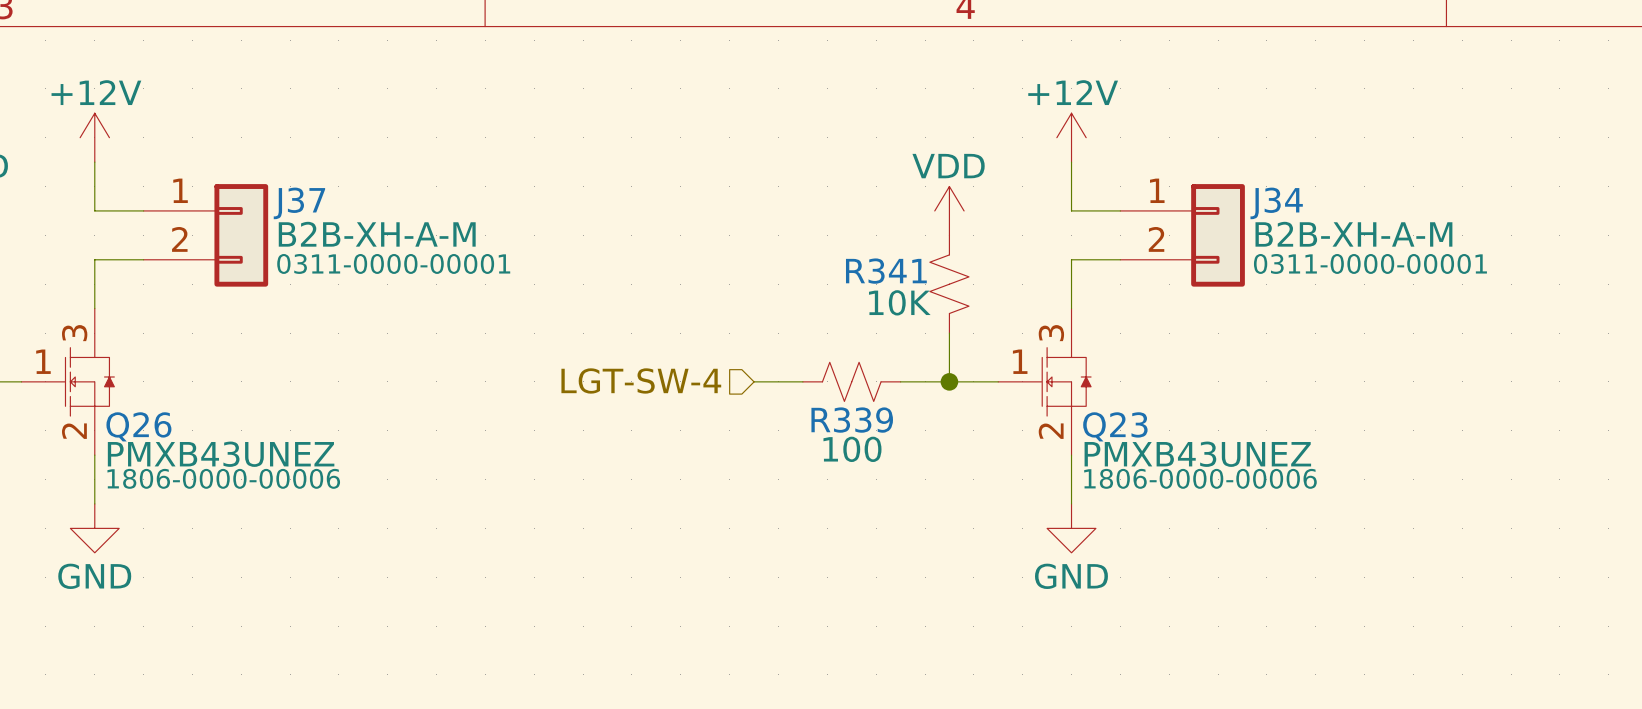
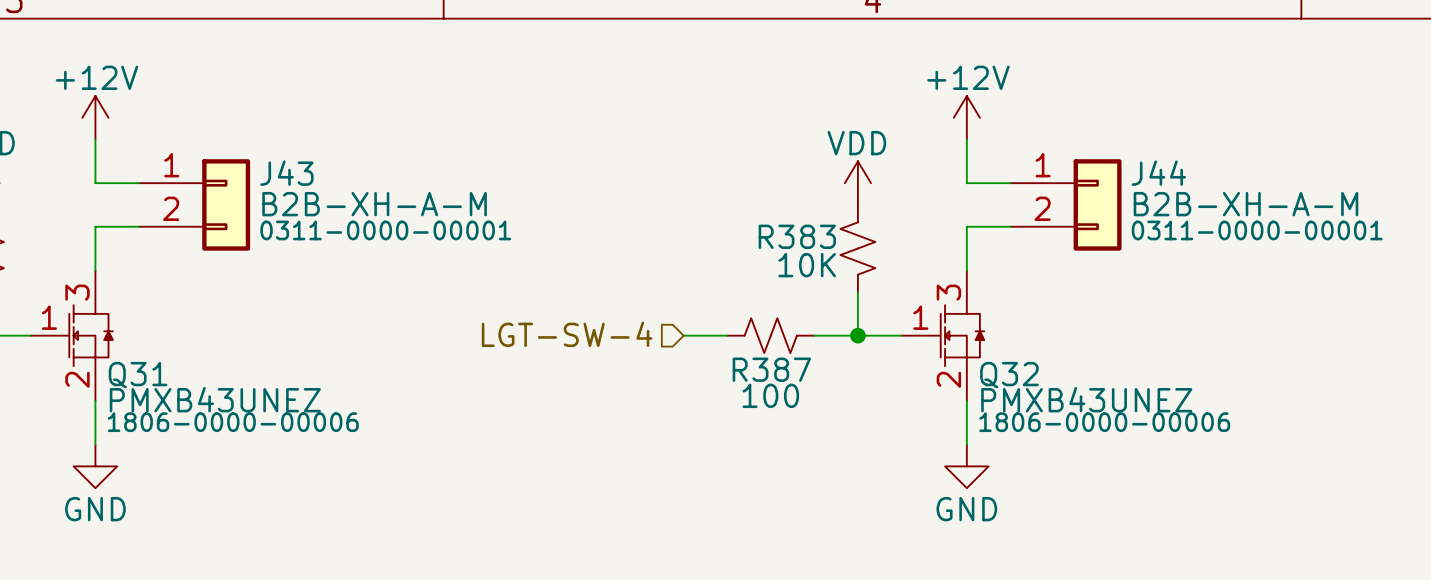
J37 name: J37 (299, 203) -> J43 (286, 173)
J34 name: J34 (1276, 203) -> J44 (1158, 173)
R341 name: R341 (886, 271) -> R383 (797, 236)
R339 name: R339 (852, 420) -> R387 (771, 369)
Q26 name: Q26 (138, 426) -> Q31 (138, 375)
Q23 name: Q23 (1115, 426) -> Q32 (1009, 375)

